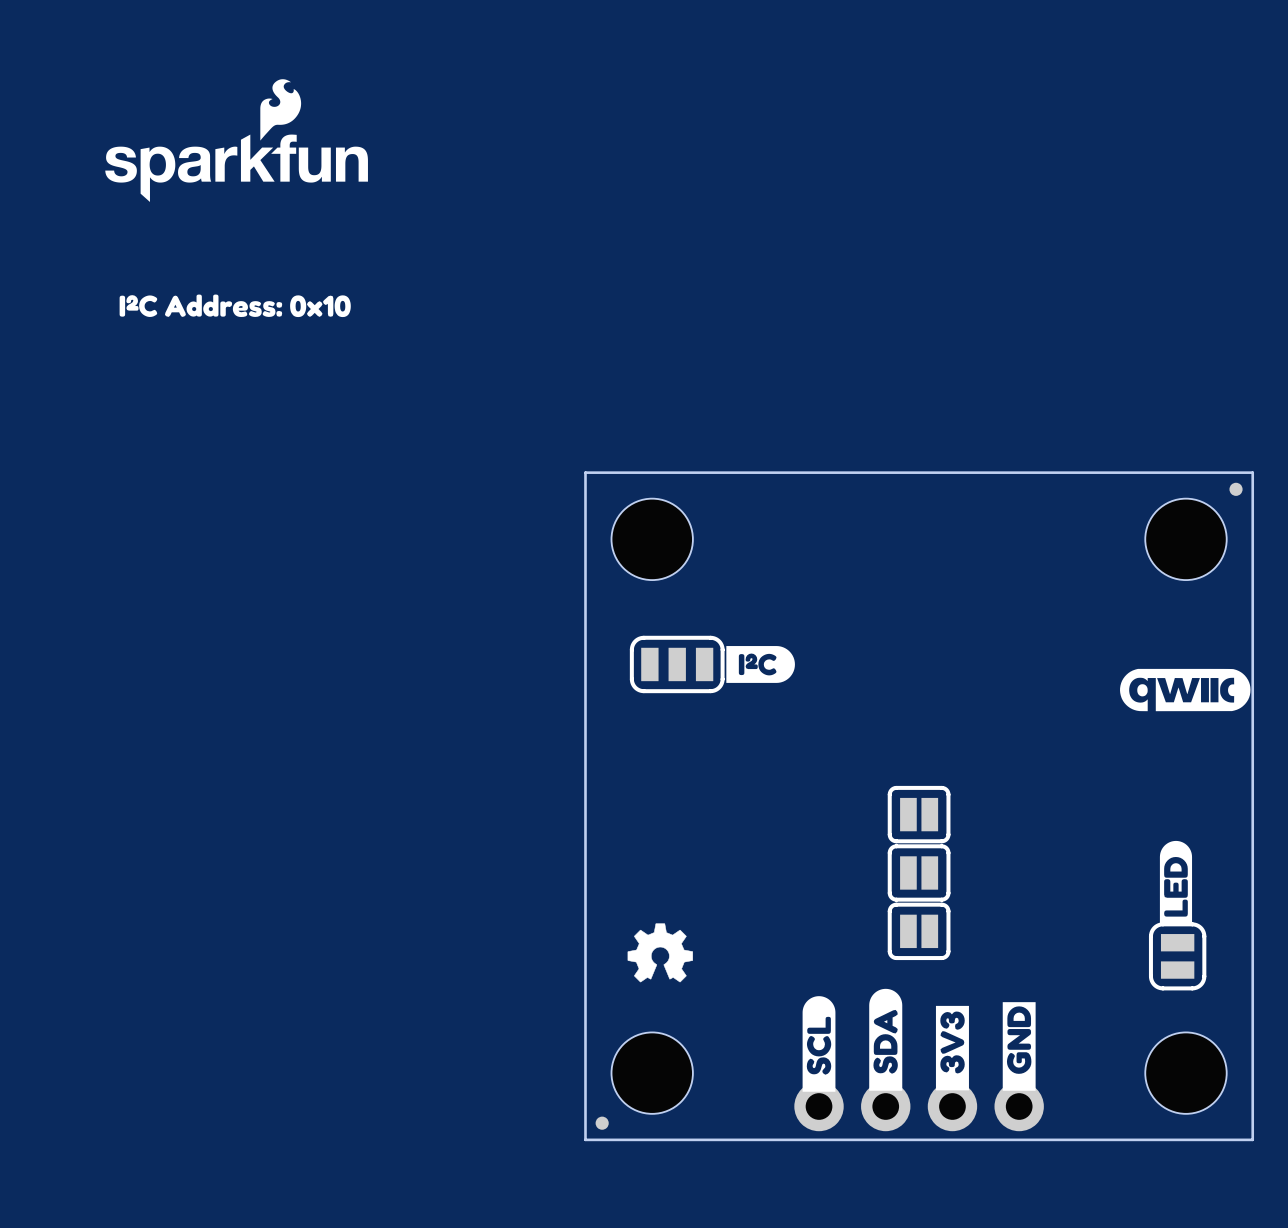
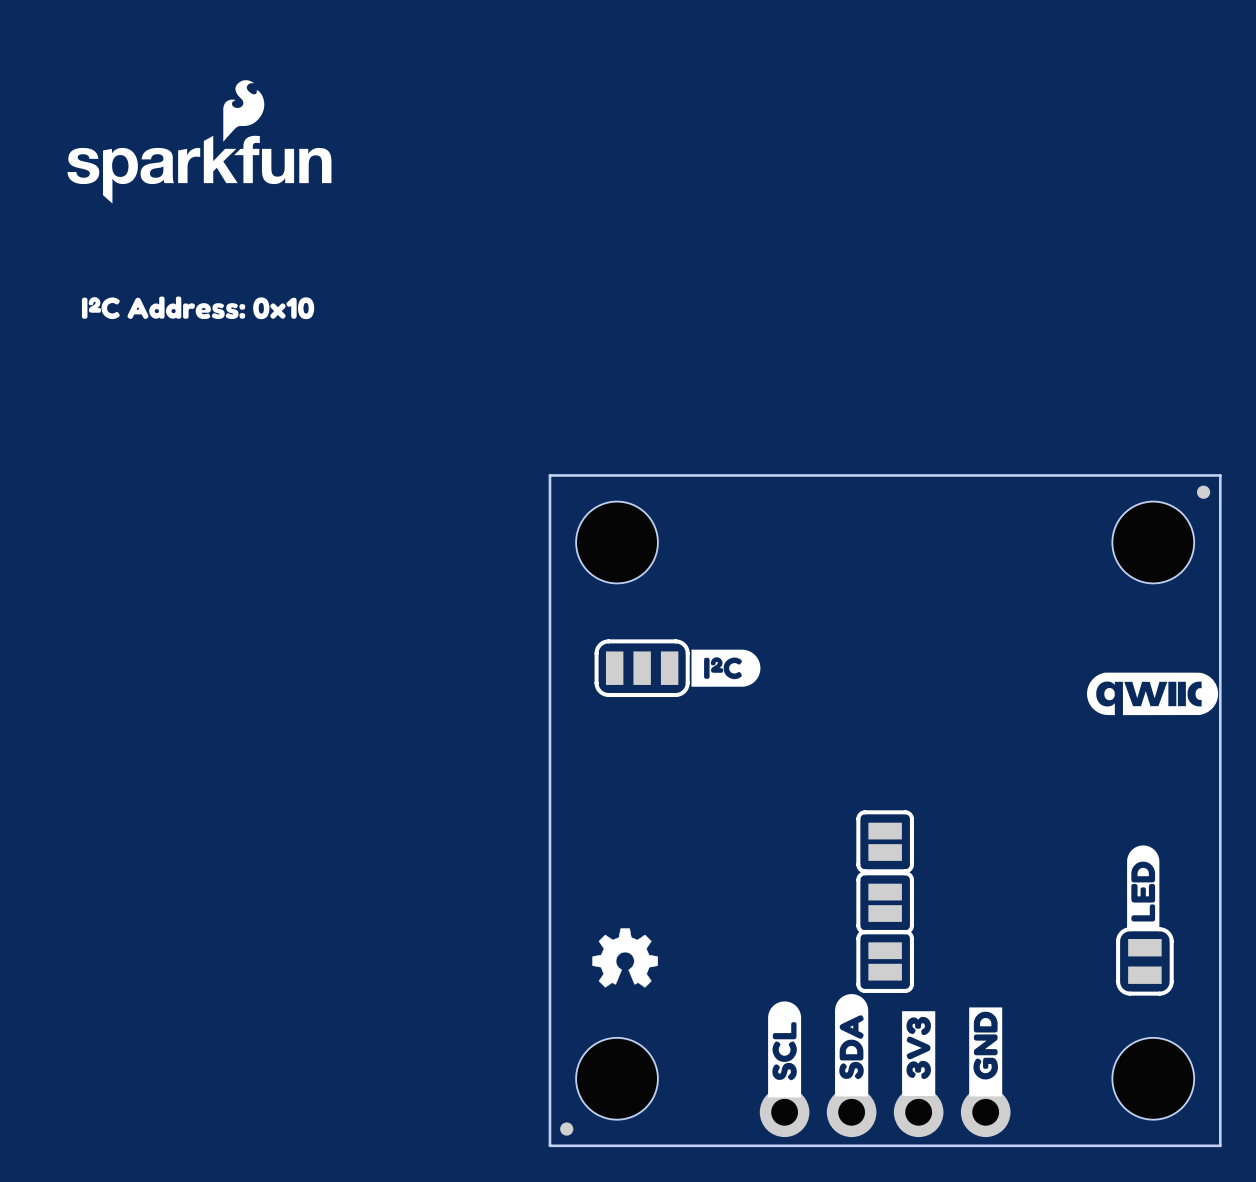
part: (919, 814) -> none
part: none -> (885, 841)
part: (919, 872) -> none
part: none -> (885, 902)
part: (919, 931) -> none
part: none -> (885, 961)

